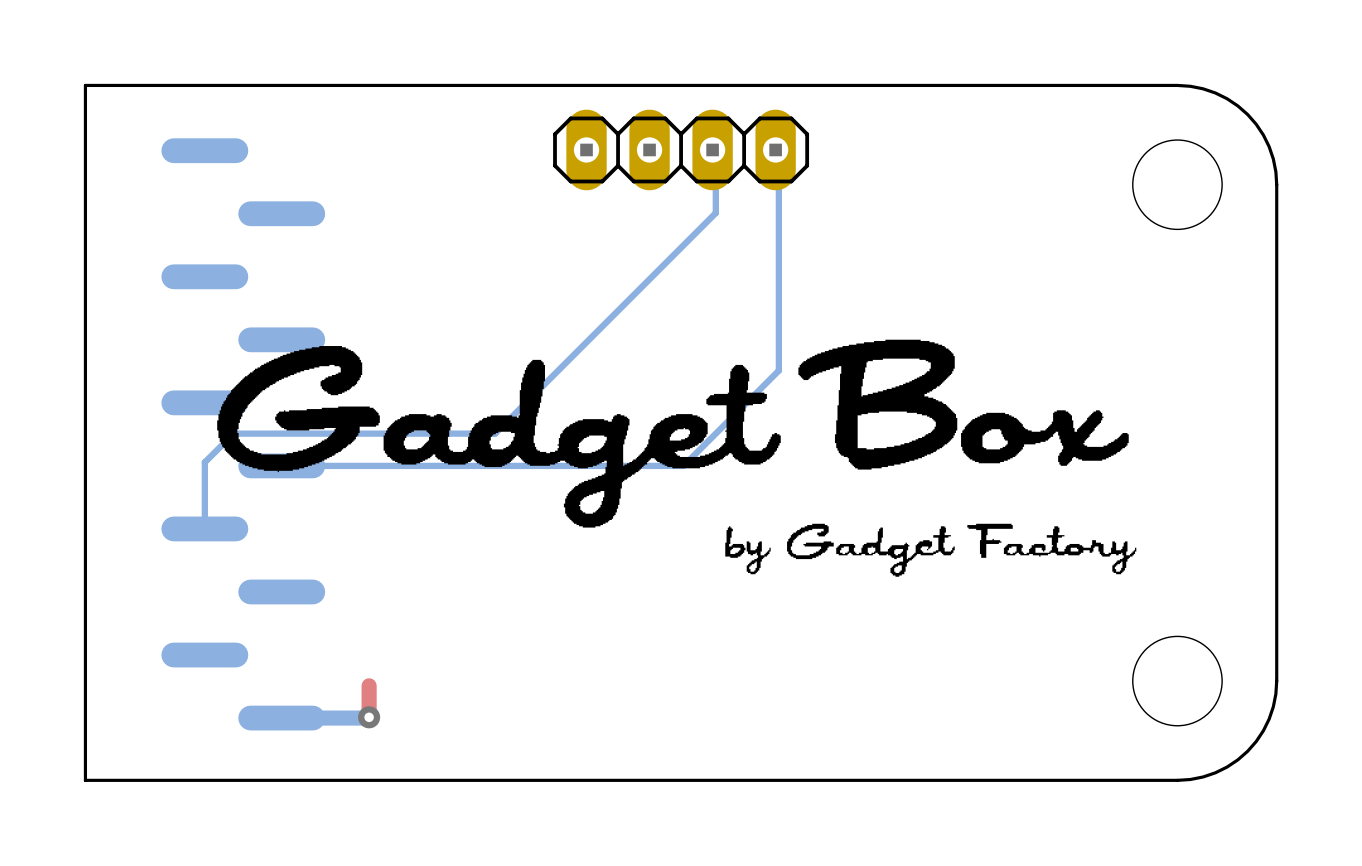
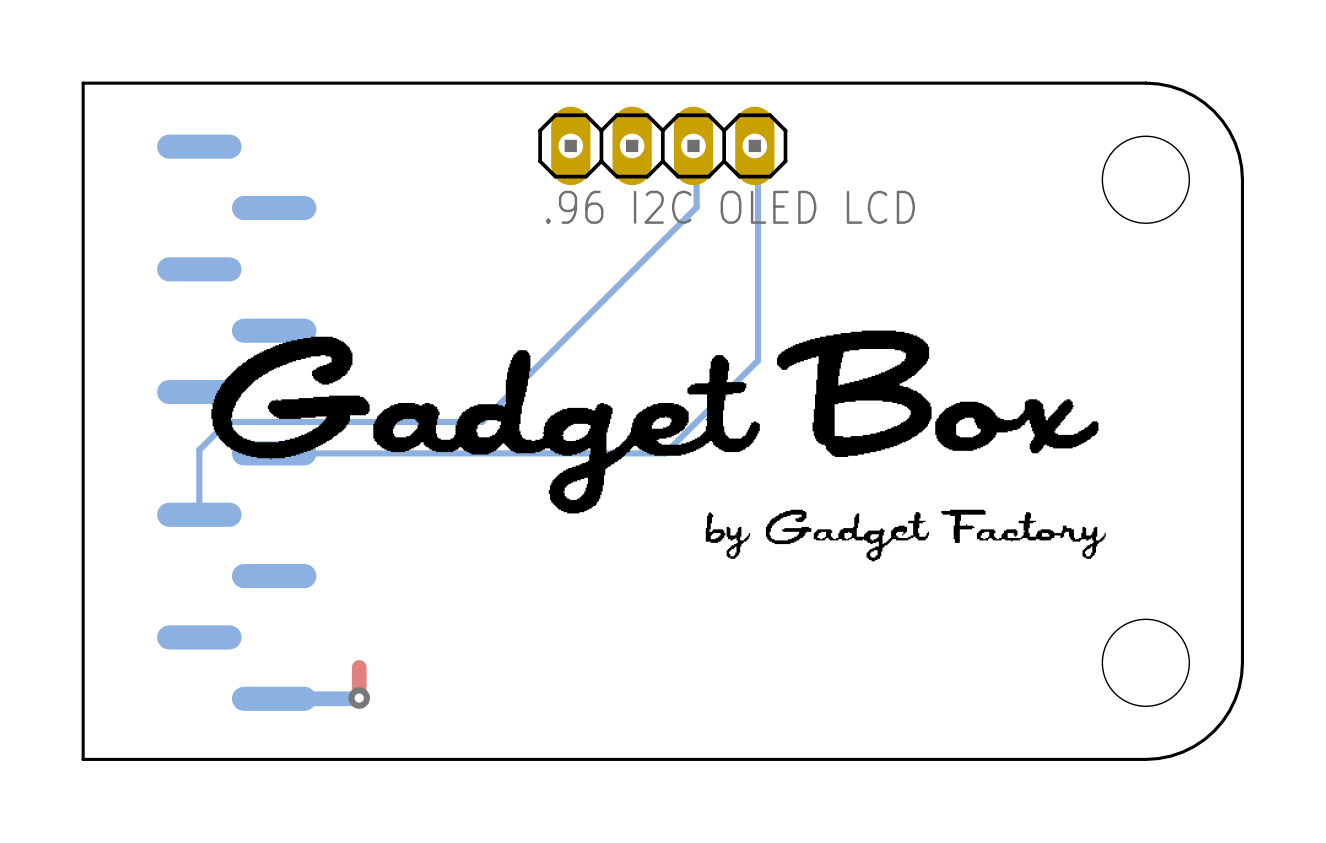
part value: none -> .96 I2C OLED LCD (730, 207)

